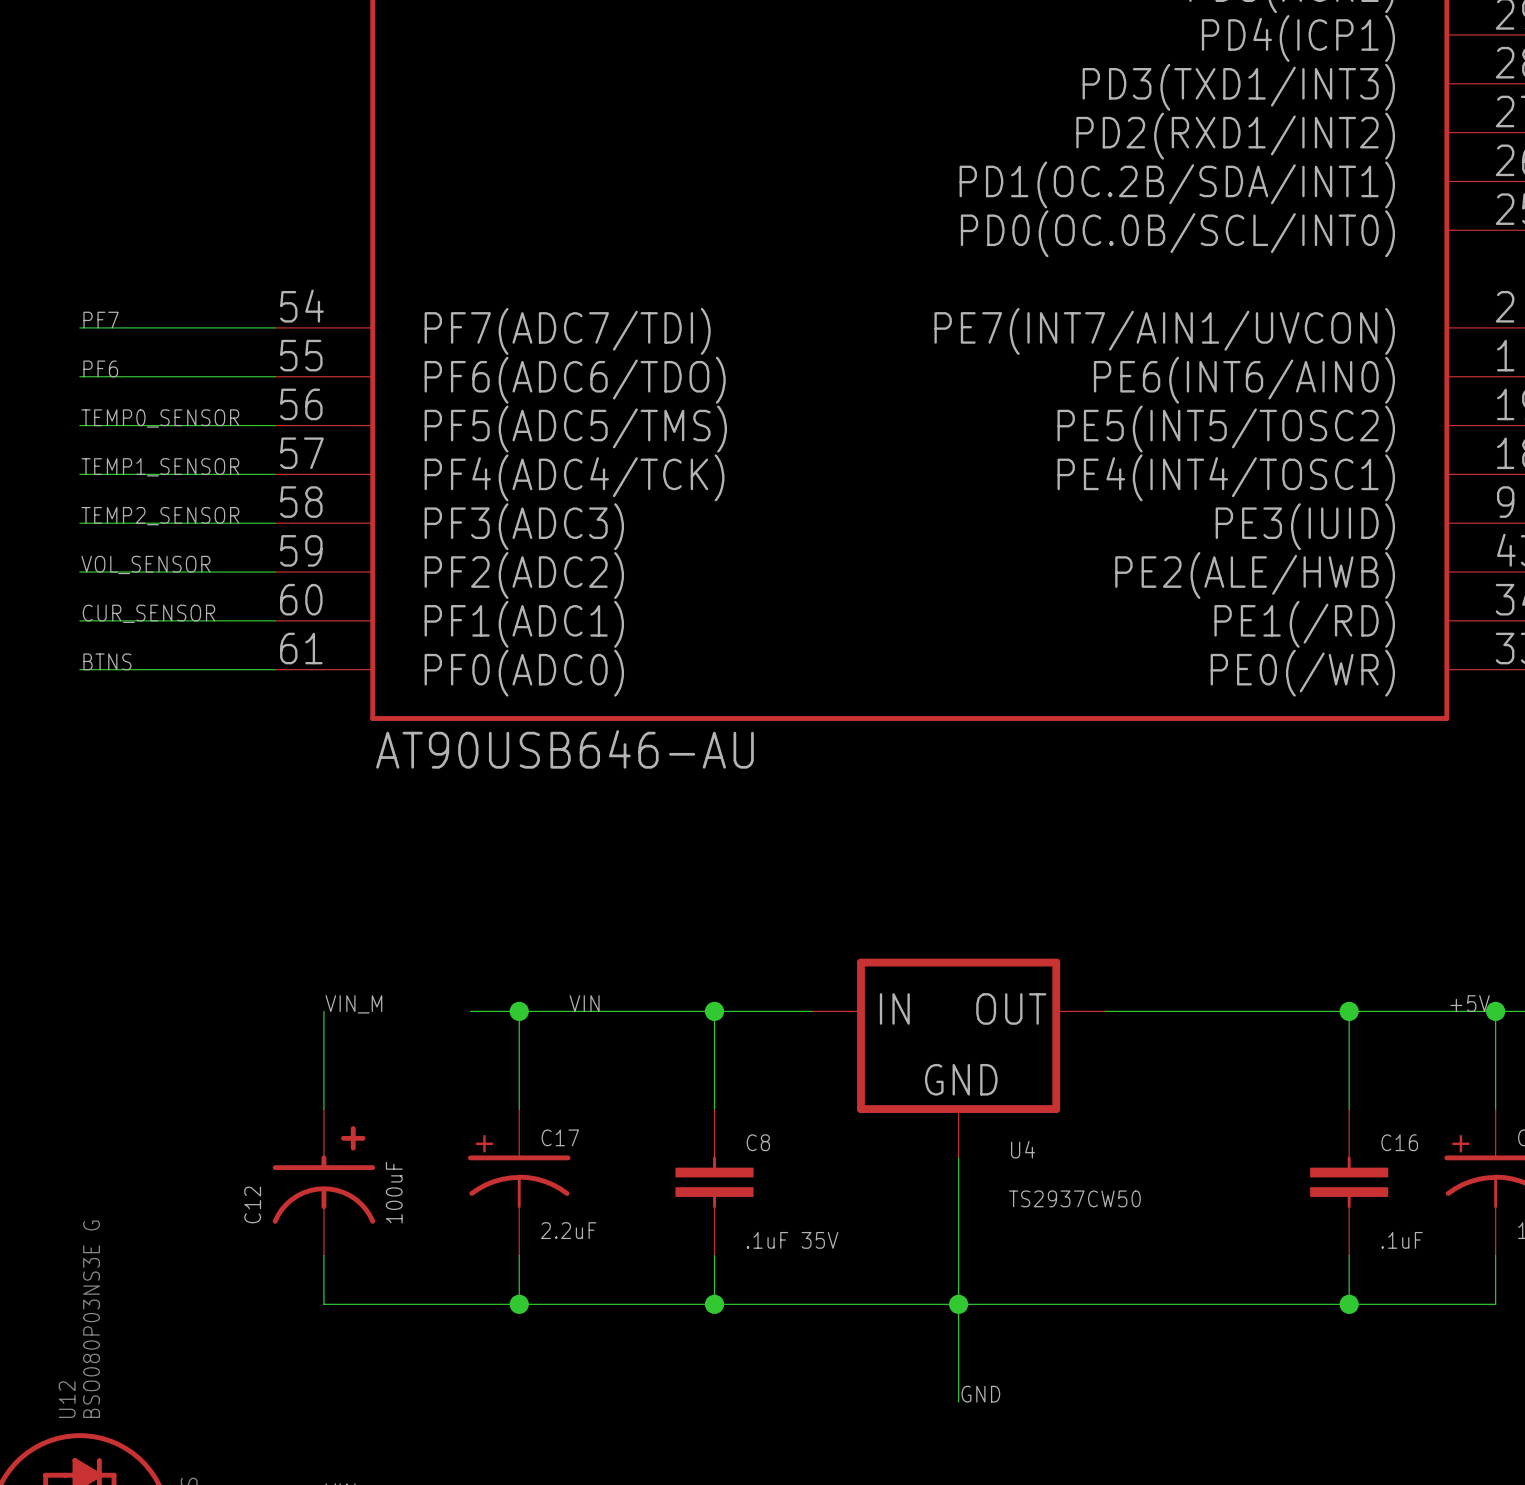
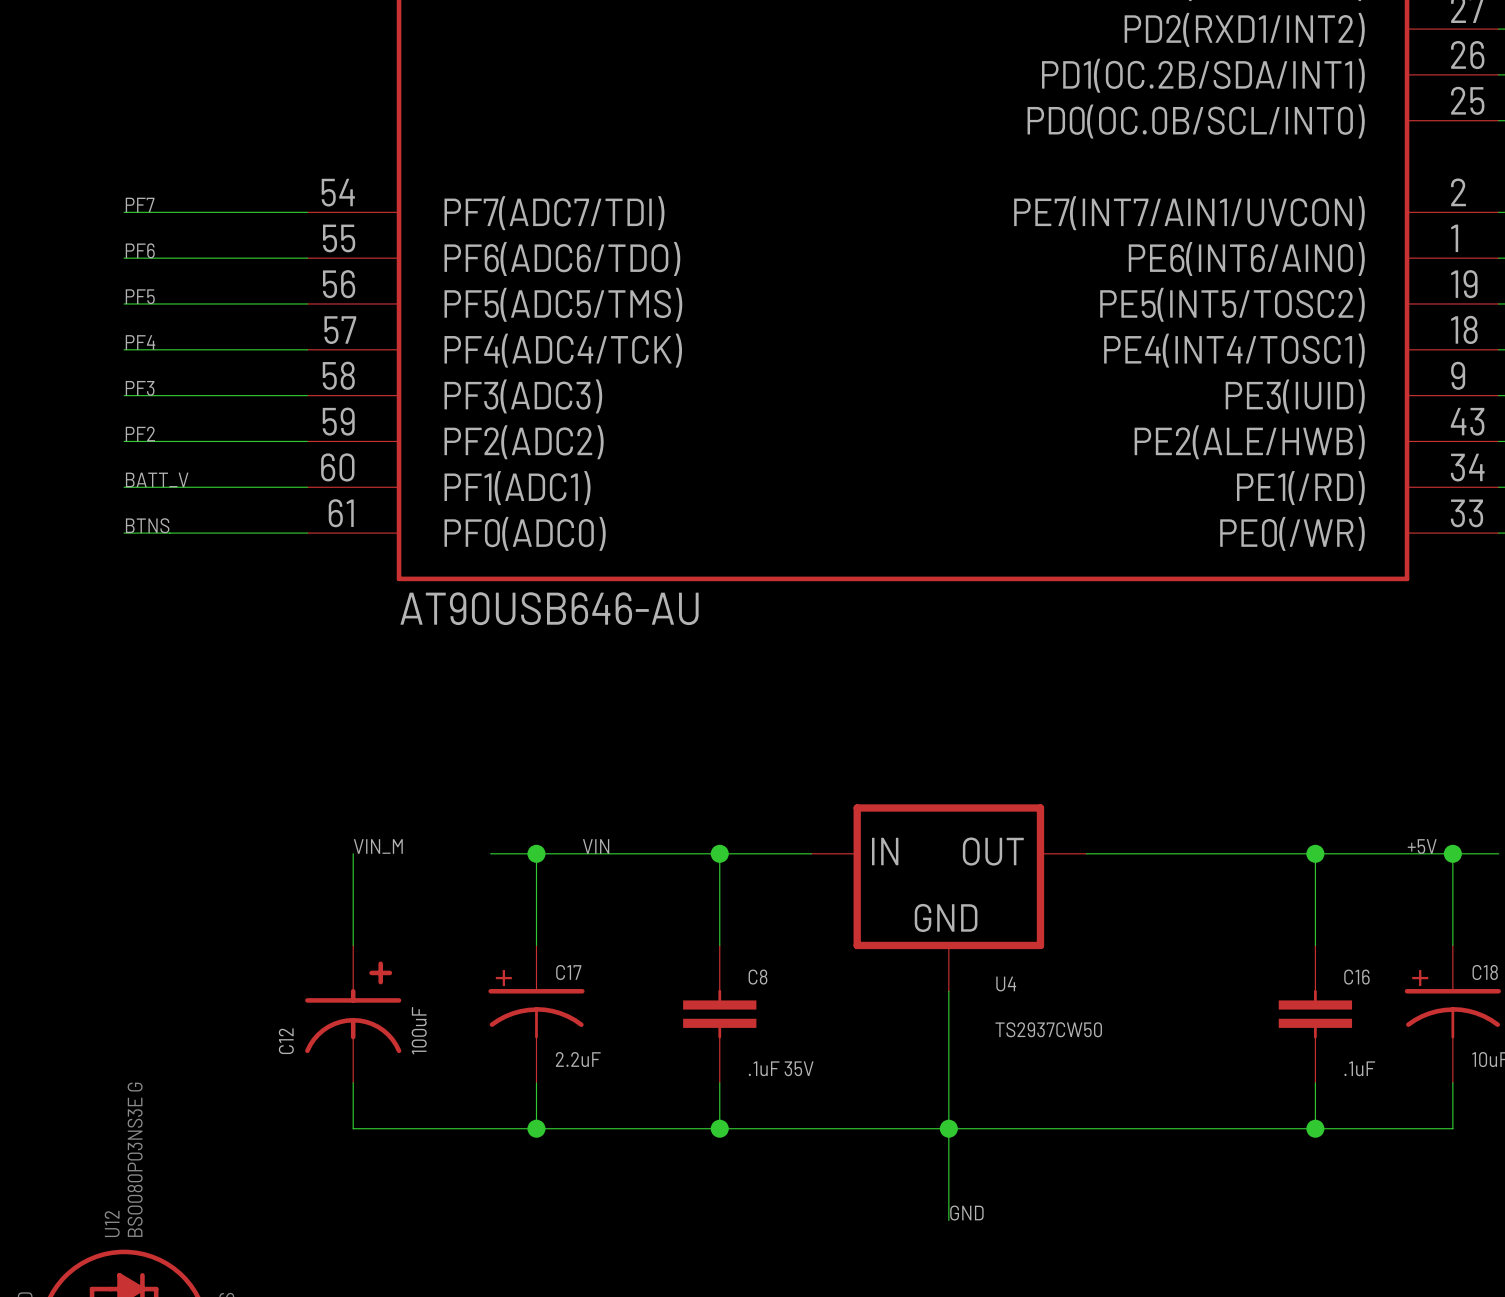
label: TEMP0_SENSOR (160, 418) -> PF5 (140, 296)
label: TEMP1_SENSOR (160, 467) -> PF4 (140, 342)
label: TEMP2_SENSOR (160, 516) -> PF3 (140, 388)
label: VOL_SENSOR (145, 564) -> PF2 (140, 434)
label: CUR_SENSOR (148, 613) -> BATT_V (157, 479)

